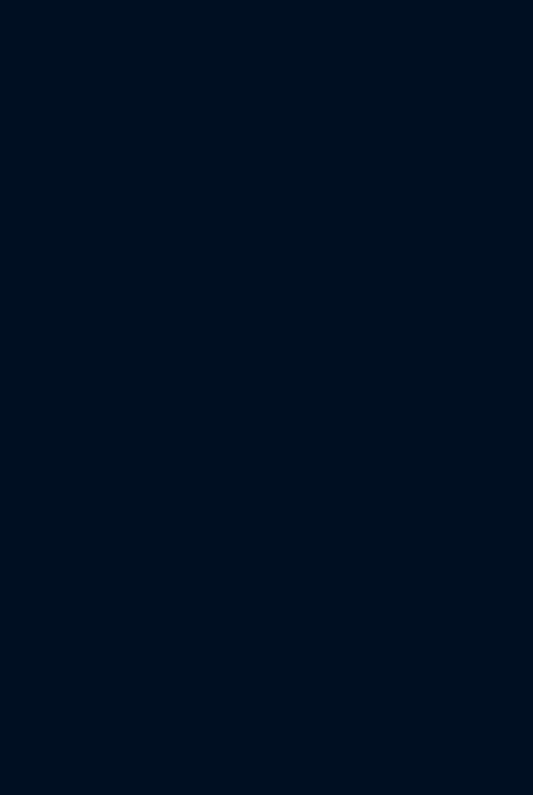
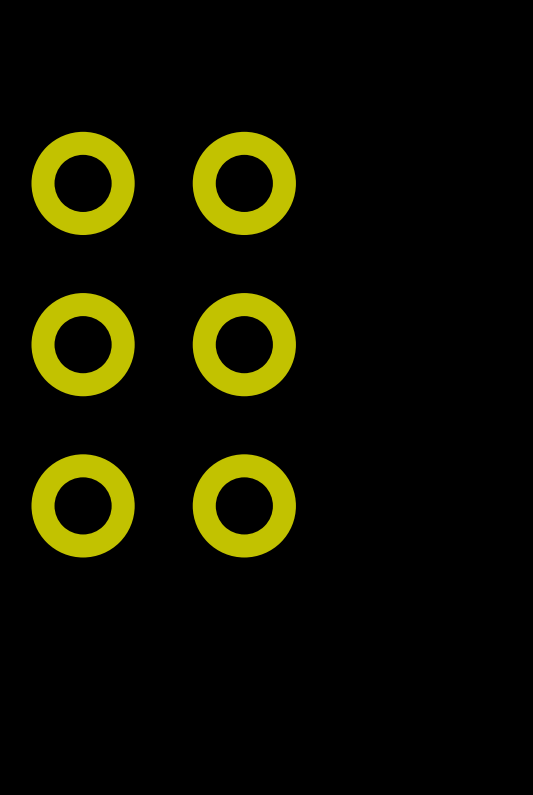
part: none -> (163, 344)

